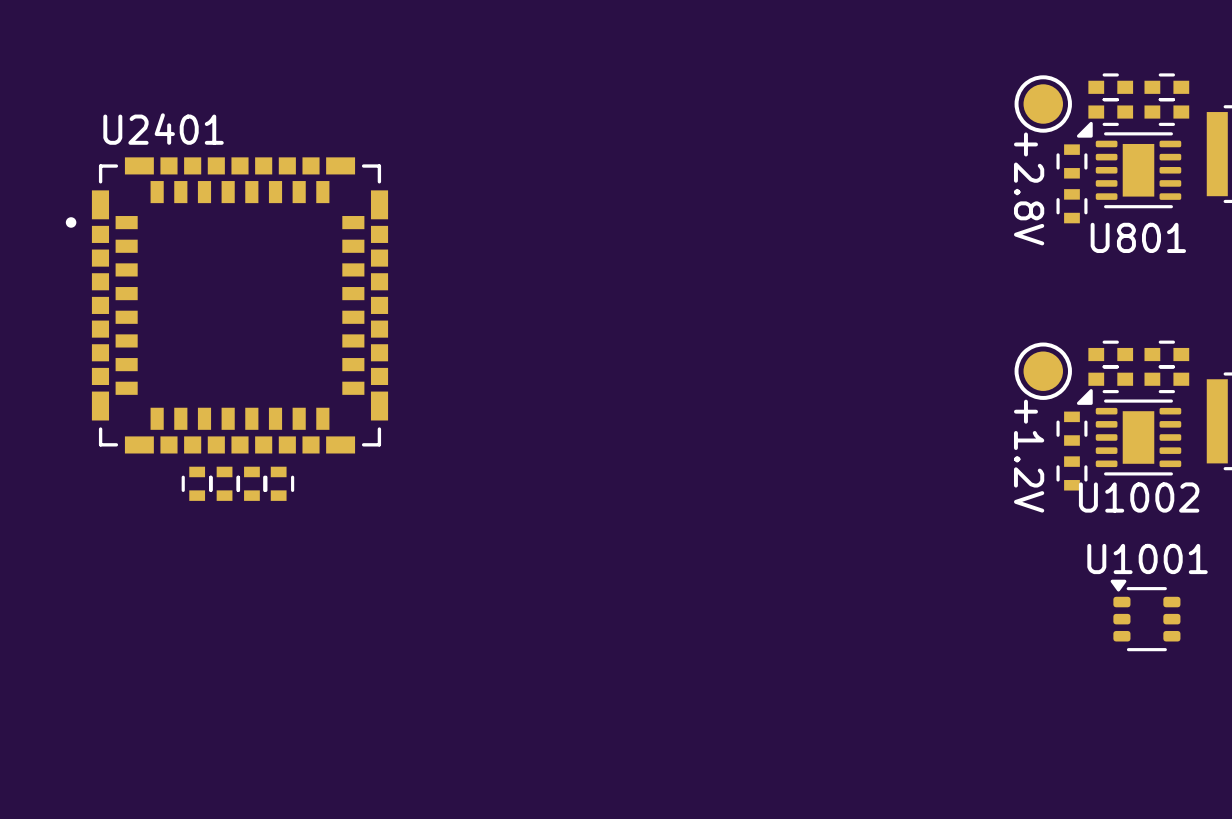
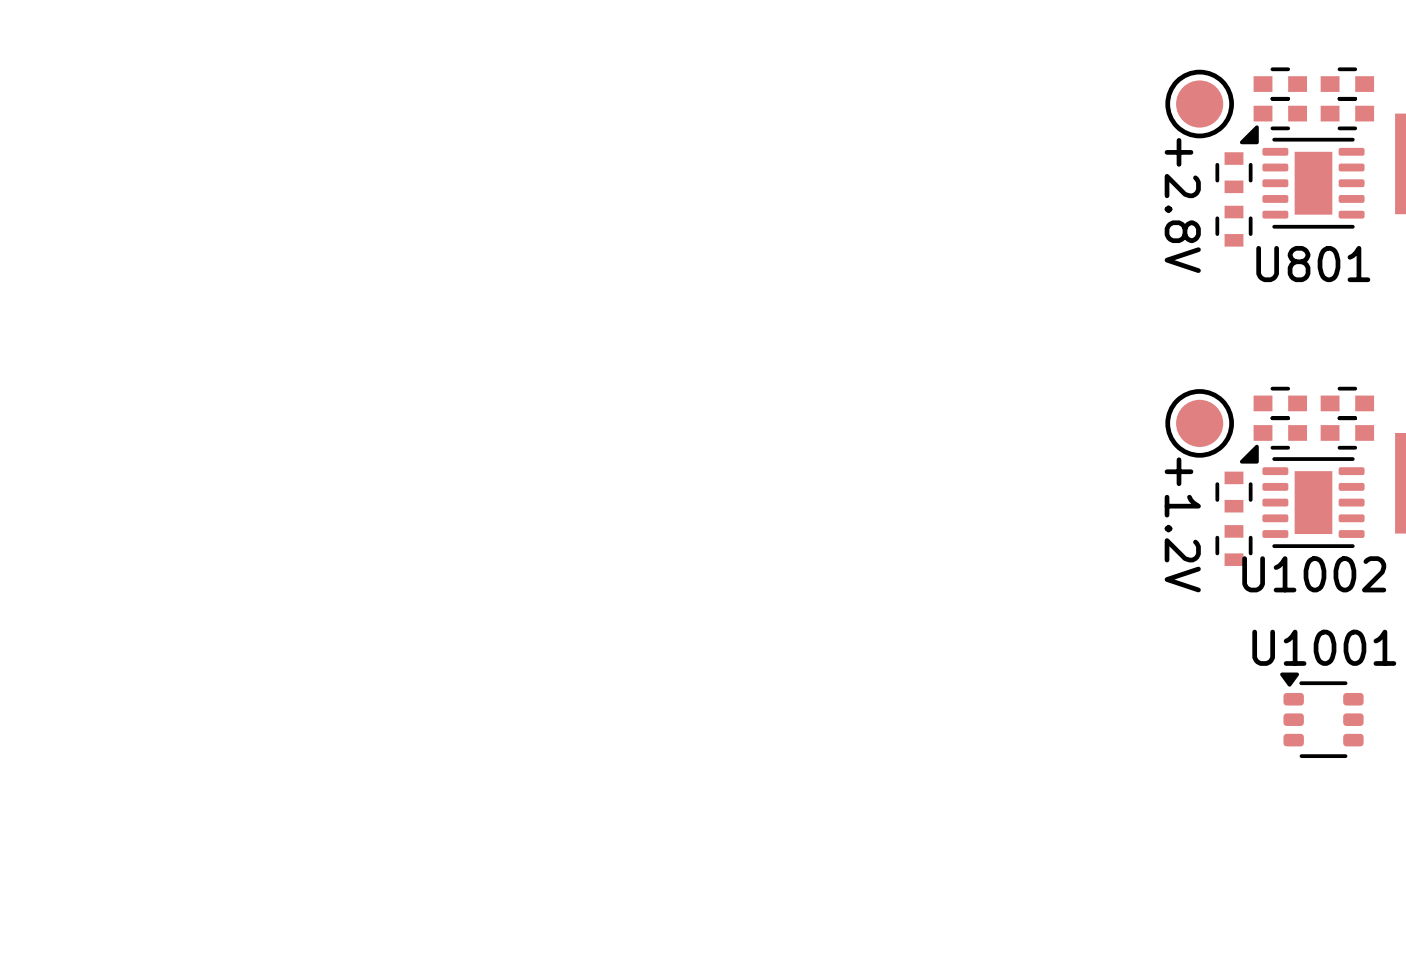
U2401: (226, 305) -> none
part: (197, 483) -> none
part: (224, 483) -> none
part: (251, 483) -> none
part: (278, 483) -> none

